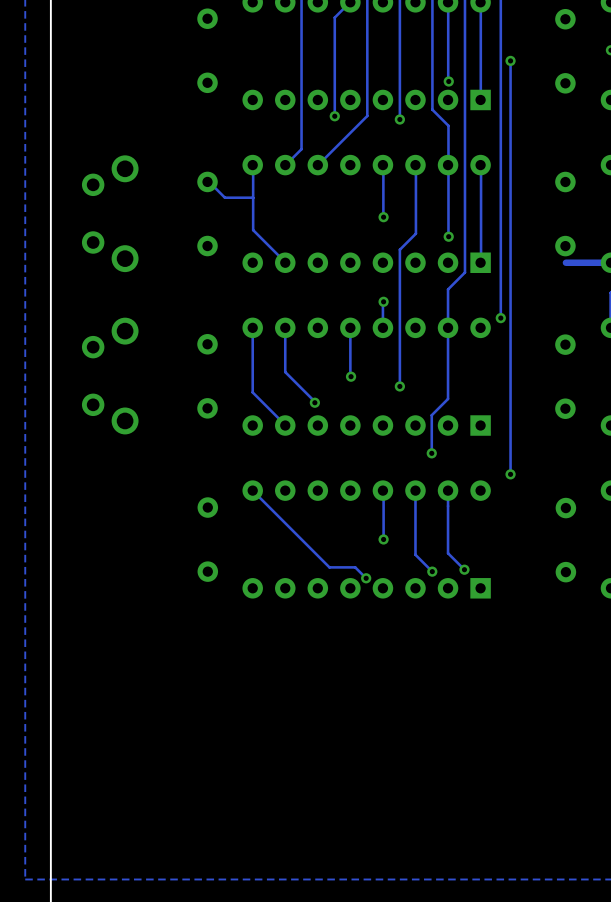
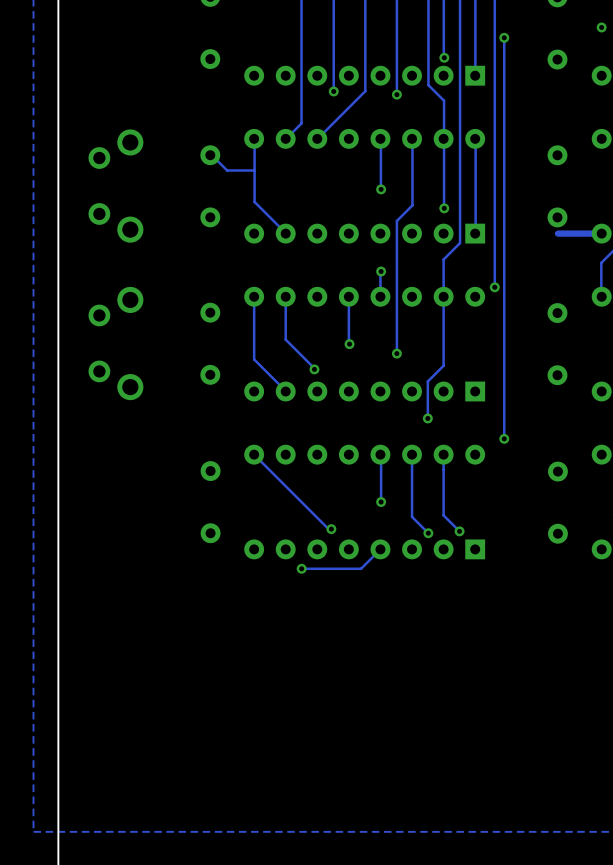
track: (332, 567) (355, 567) (366, 578) -> none
via: none -> (331, 529)
via: (366, 578) -> none
track: none -> (380, 549) (361, 568) (301, 568)
via: none -> (301, 568)

